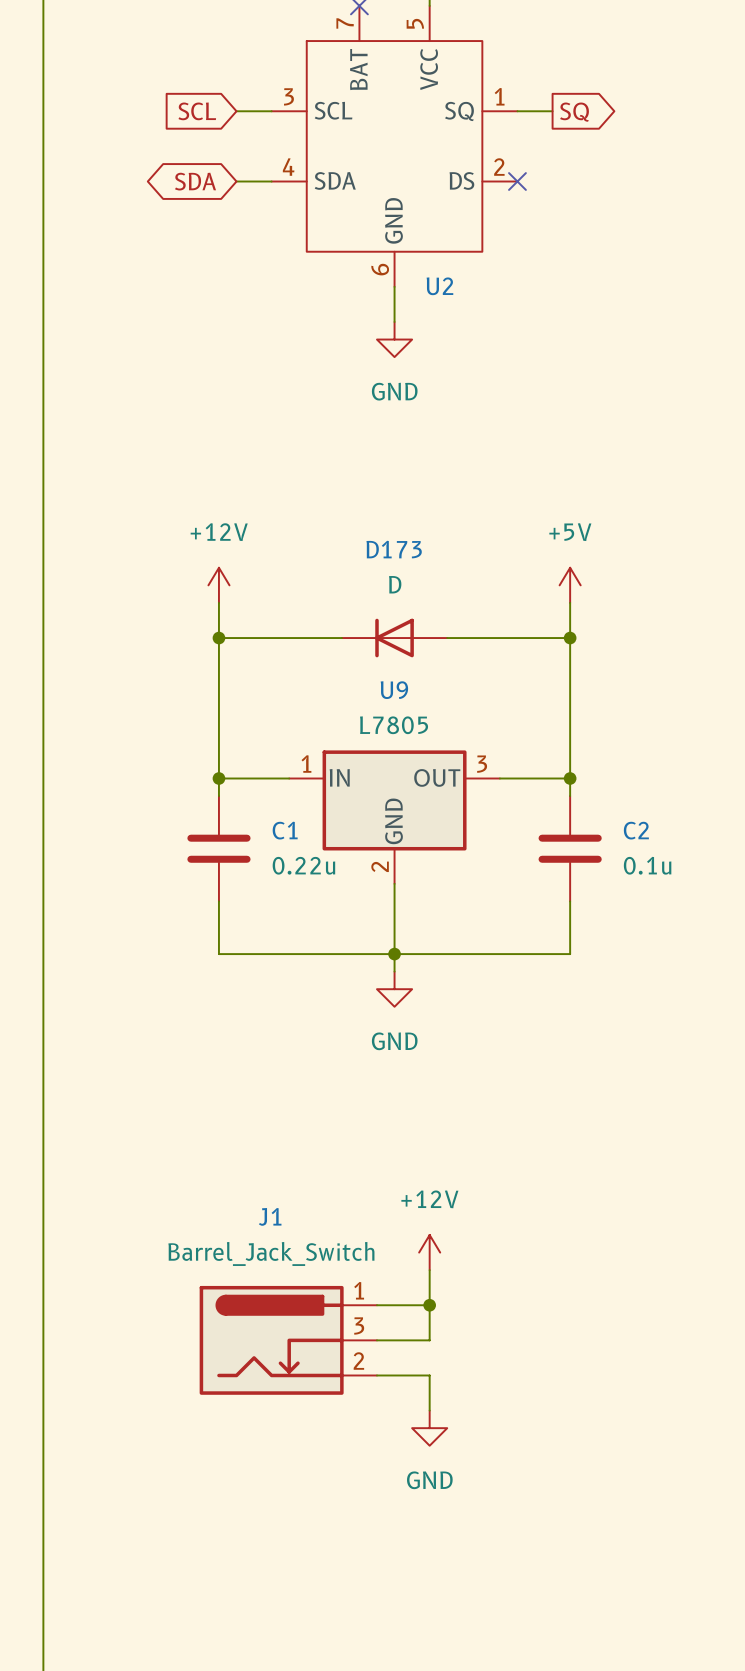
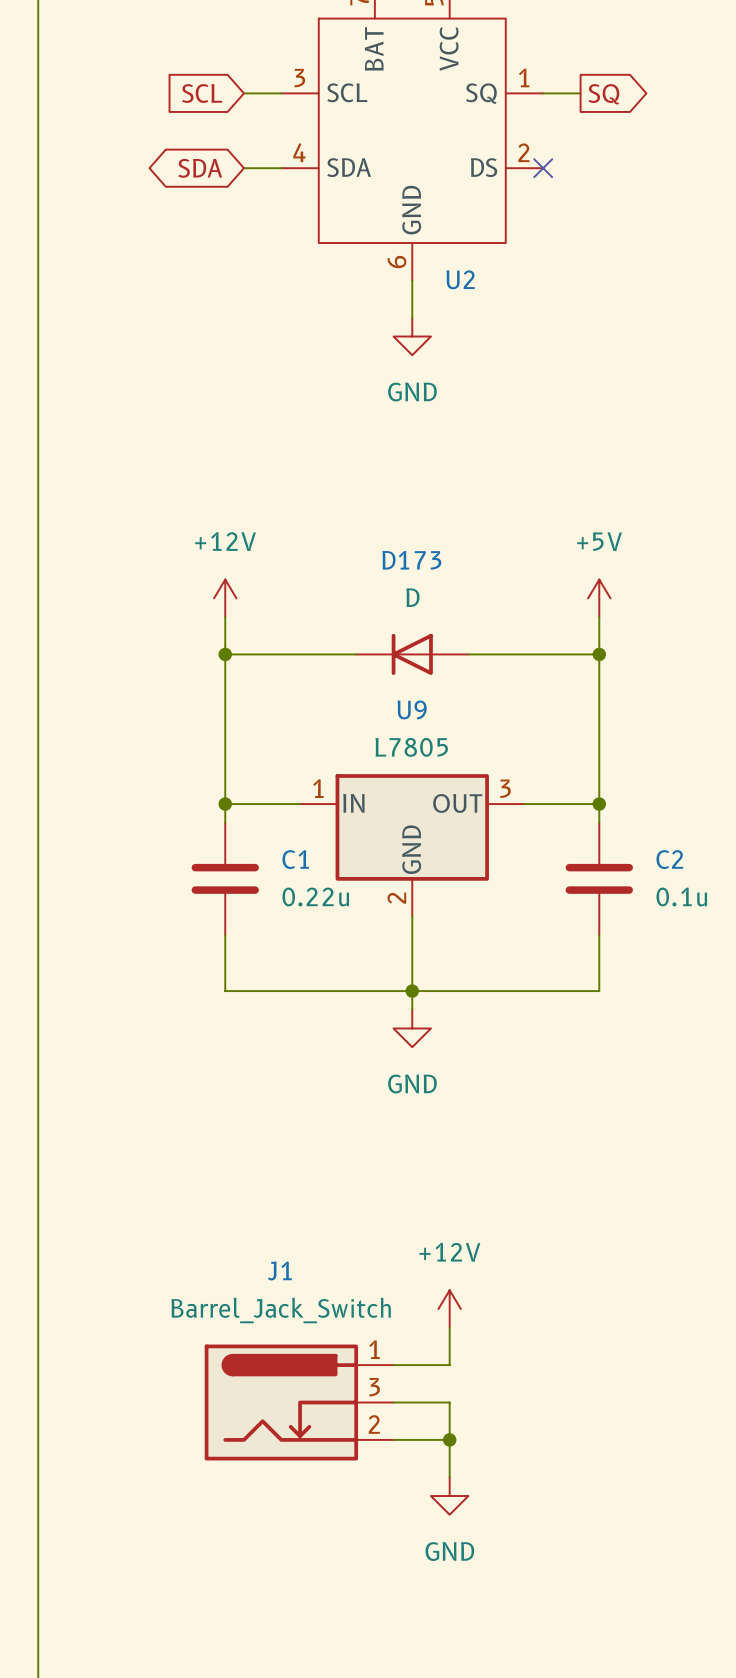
wire: (429, 1305) (429, 1340) -> (449, 1439) (449, 1402)
junction position: (429, 1305) -> (449, 1439)

